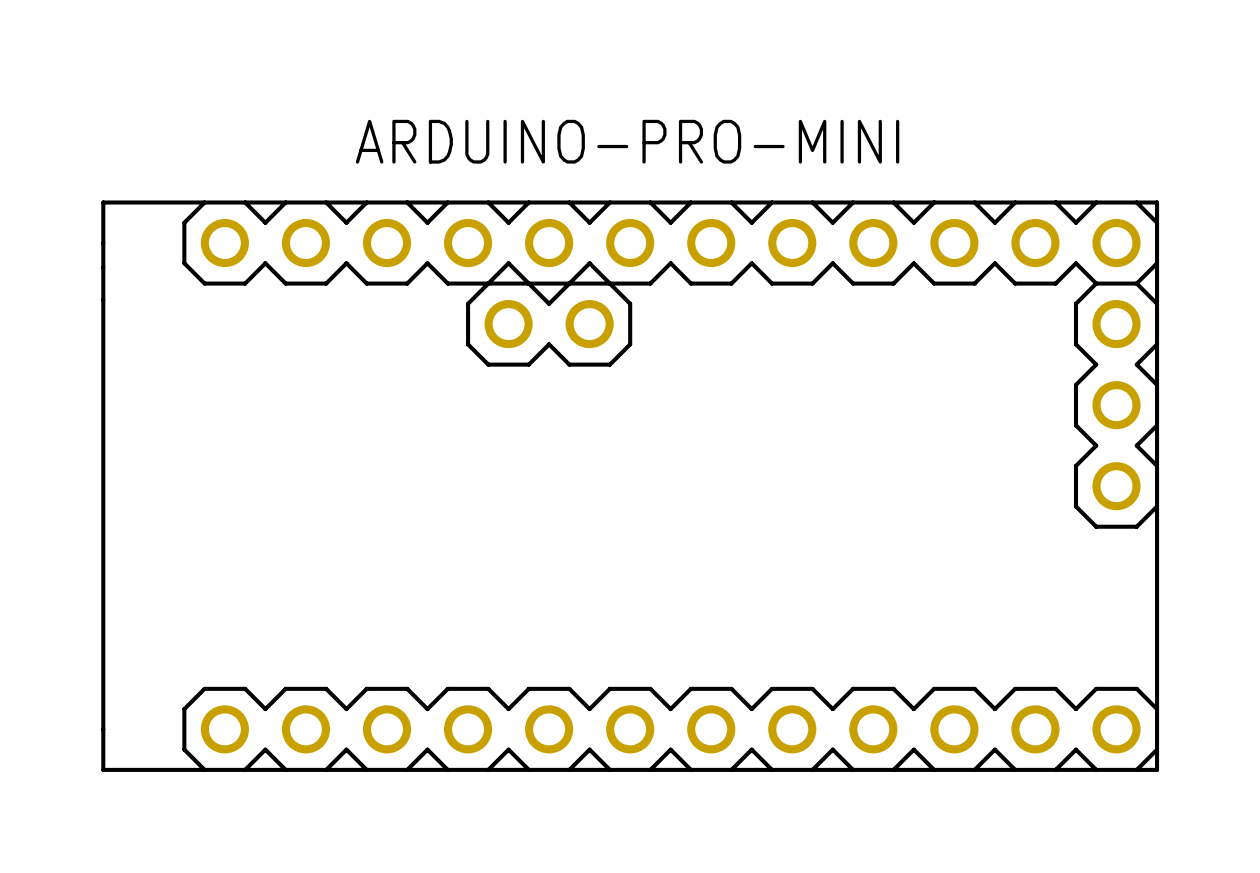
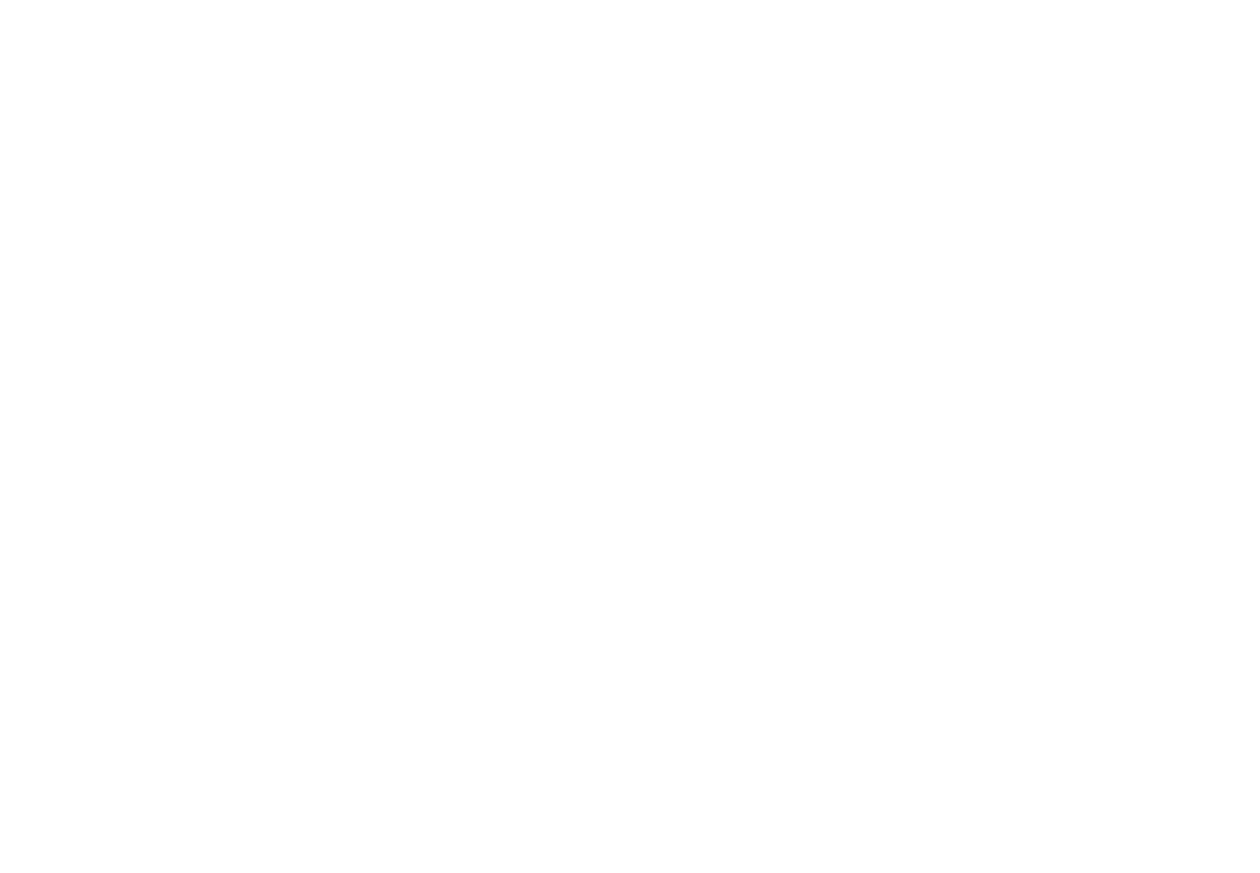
ARDUINO-PRO-MINI: (630, 486) -> none

